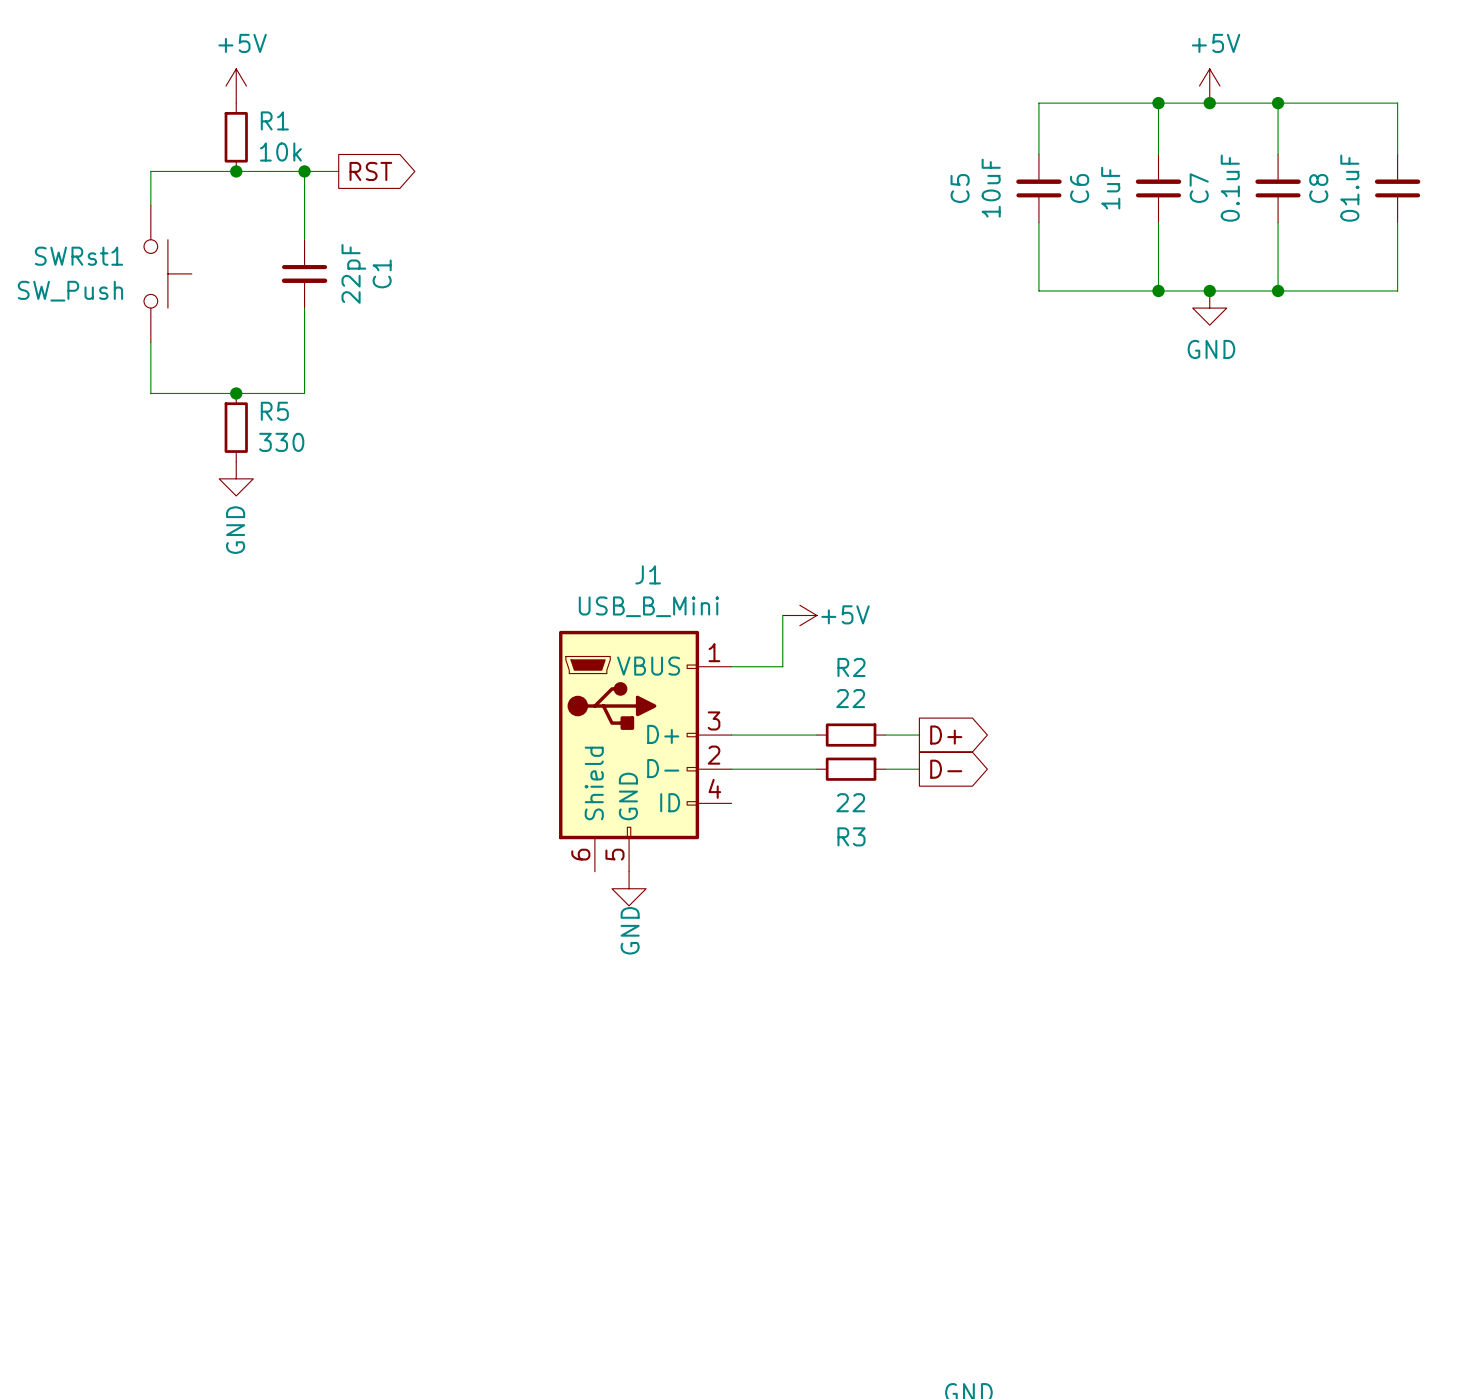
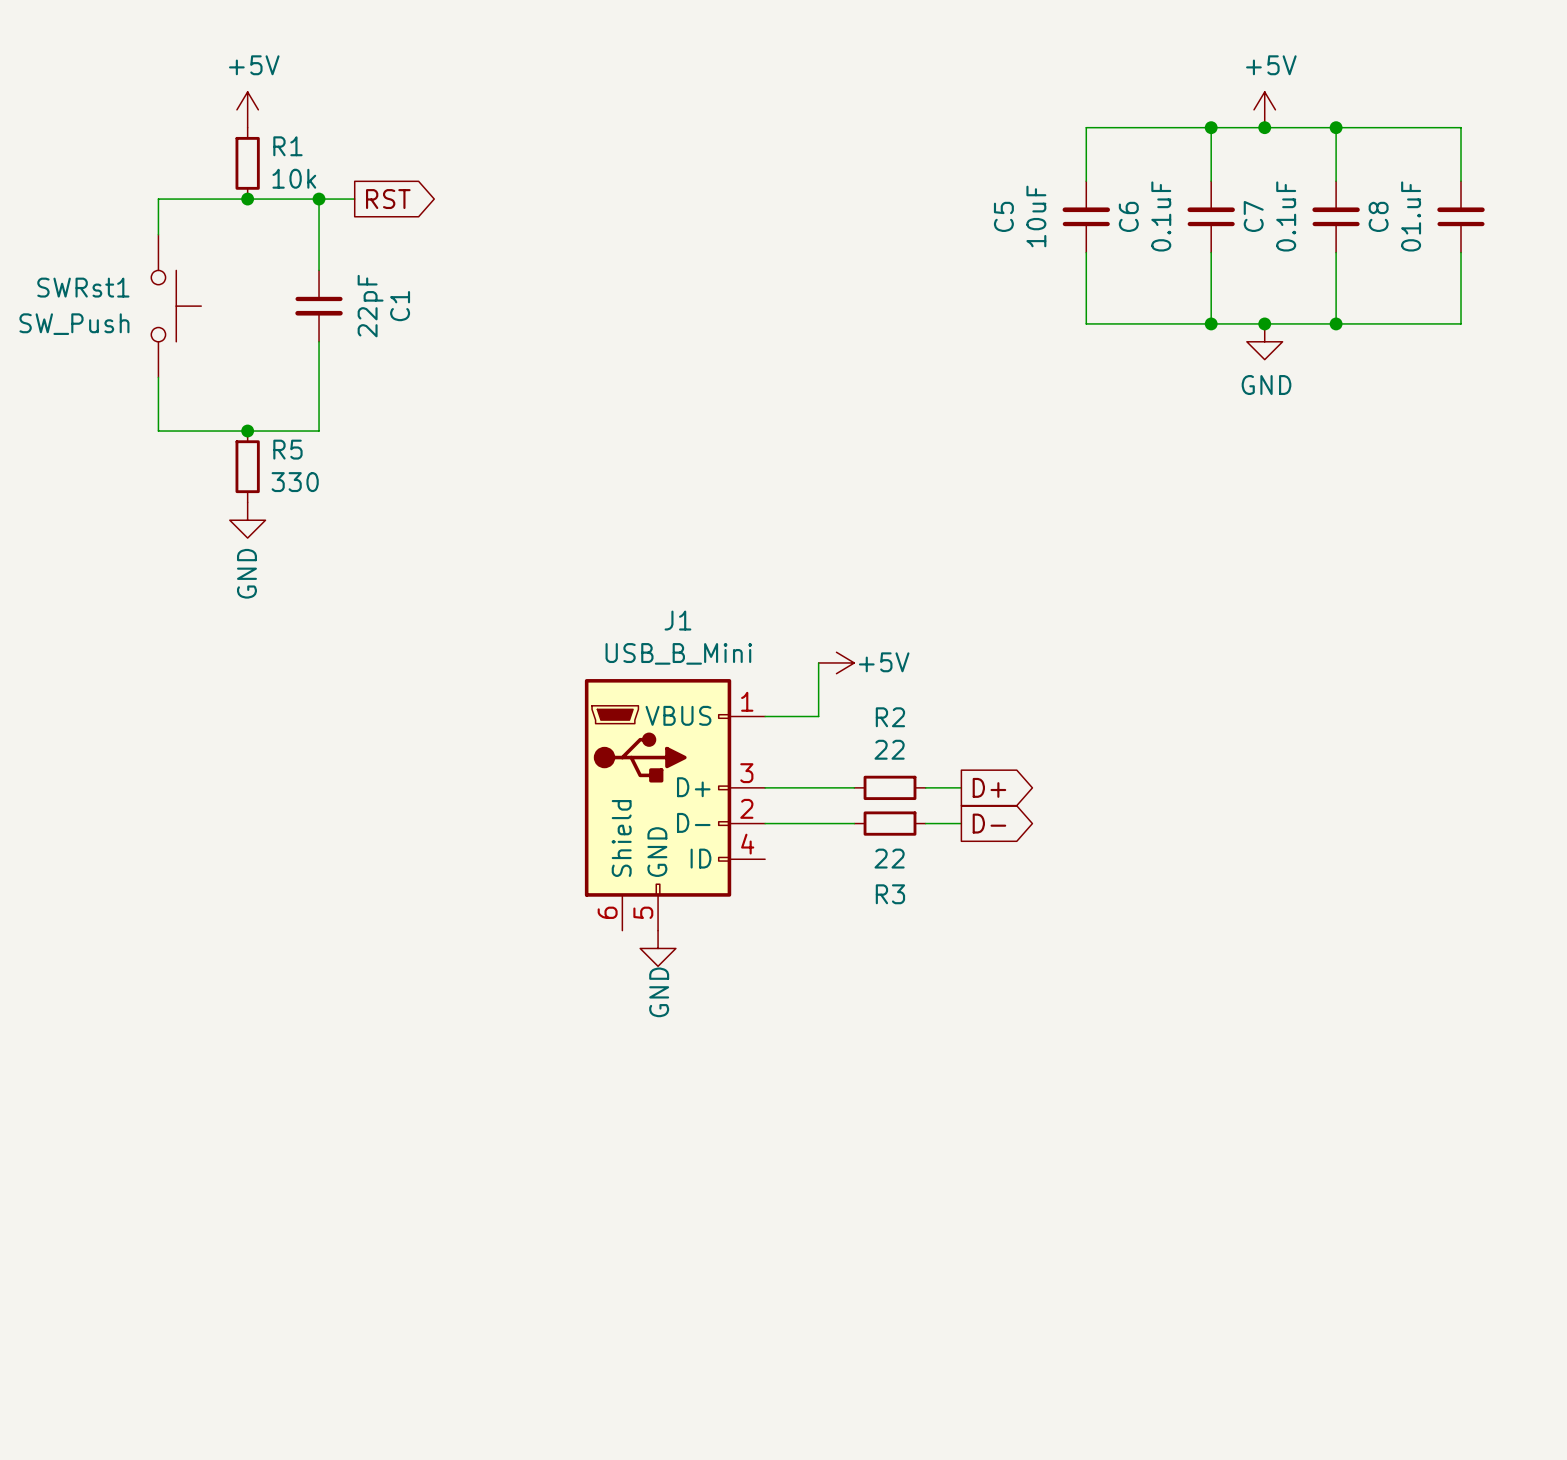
C6 value: 1uF (1110, 188) -> 0.1uF (1161, 216)

